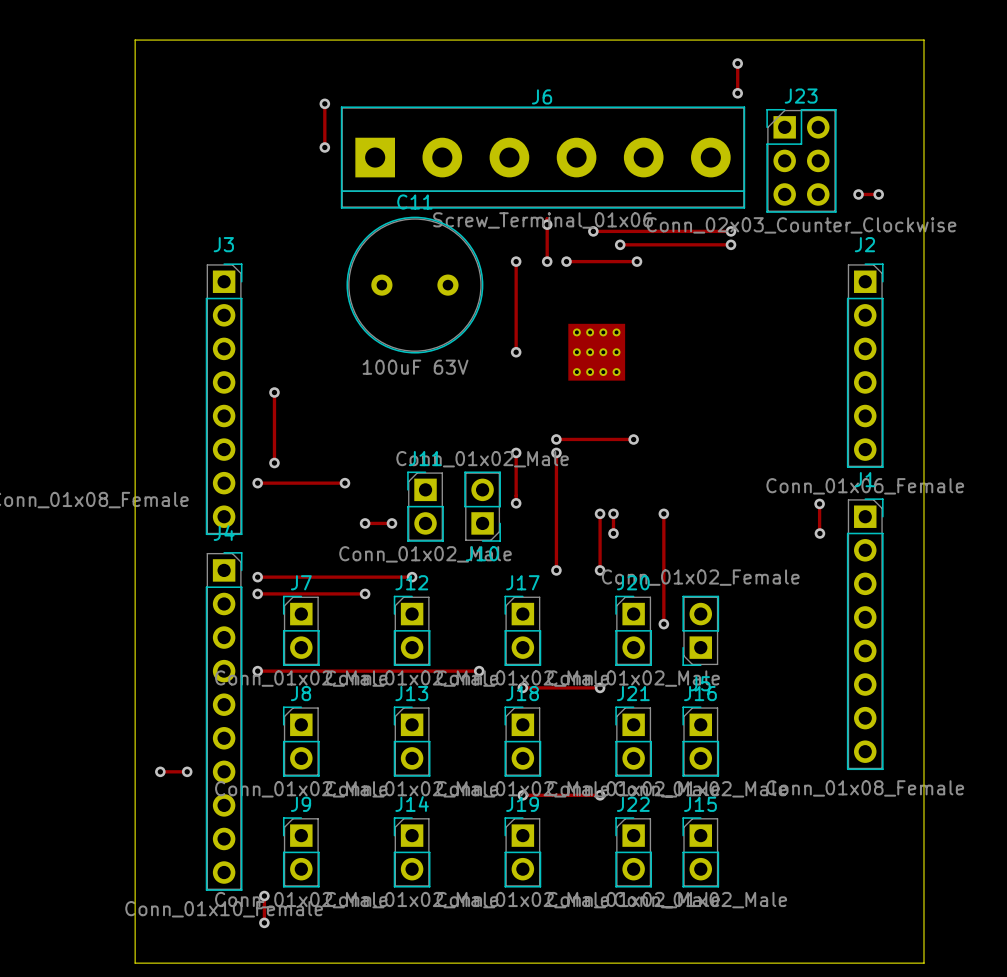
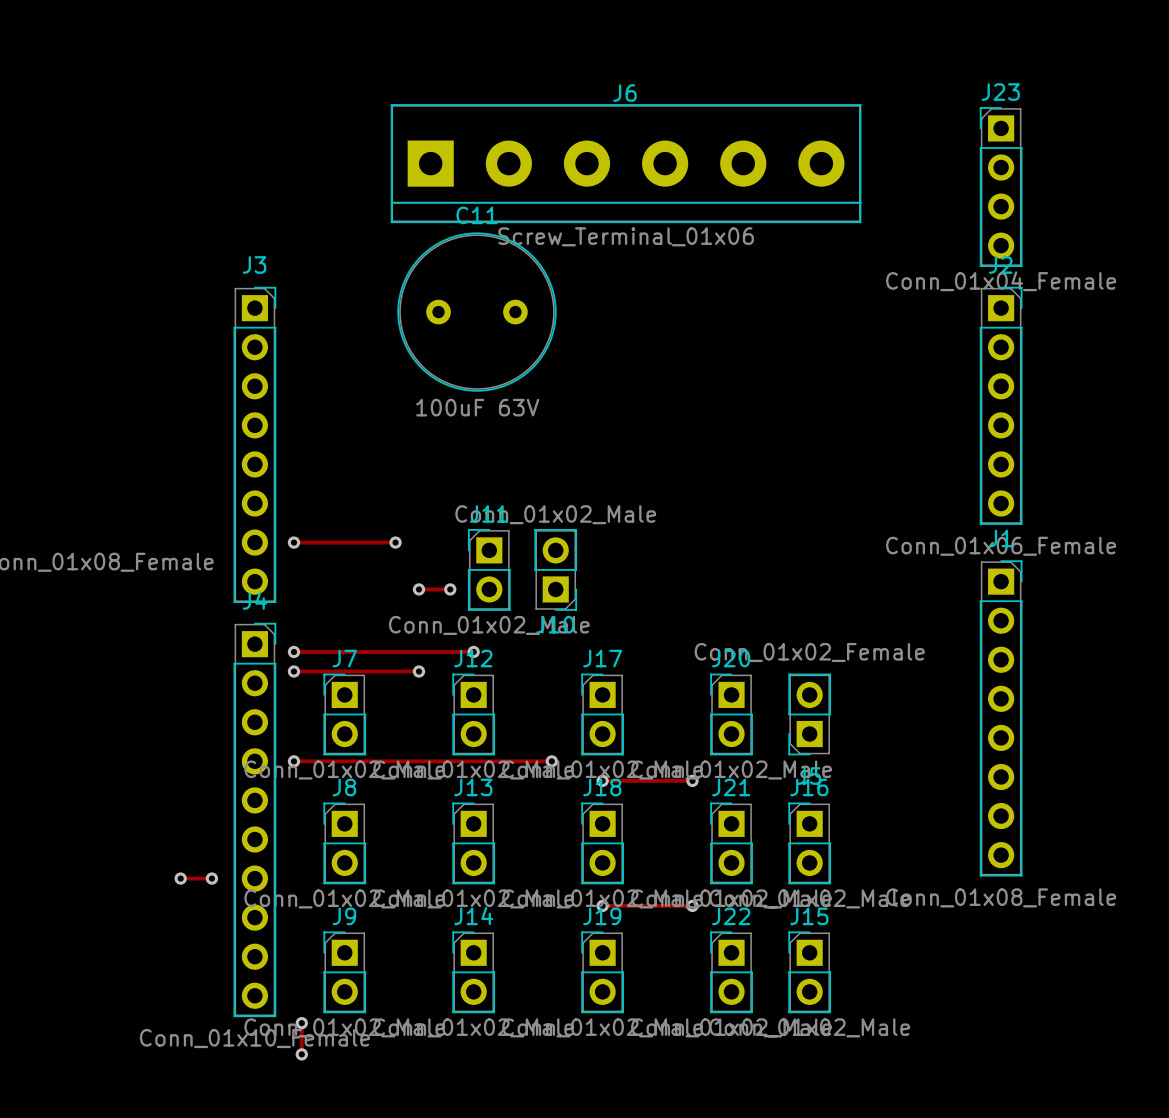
board edge: (135, 40) (135, 963) (923, 963) (923, 40) (135, 40) -> none
track: (737, 63) (737, 93) -> none
via: (737, 63) -> none
via: (737, 93) -> none
track: (324, 103) (324, 147) -> none
via: (324, 103) -> none
J23 footprint: [766, 108, 837, 213] -> [979, 107, 1023, 268]
via: (324, 147) -> none
track: (858, 194) (878, 194) -> none
via: (858, 194) -> none
via: (878, 194) -> none
track: (547, 218) (547, 261) -> none
via: (547, 224) -> none
J23 value: Conn_02x03_Counter_Clockwise (801, 225) -> Conn_01x04_Female (1001, 281)
track: (593, 231) (730, 231) -> none
via: (593, 231) -> none
via: (730, 231) -> none
track: (620, 244) (730, 244) -> none
via: (620, 244) -> none
via: (730, 244) -> none
track: (516, 261) (516, 352) -> none
via: (516, 261) -> none
via: (547, 261) -> none
track: (566, 261) (636, 261) -> none
via: (566, 261) -> none
via: (636, 261) -> none
via: (516, 352) -> none
part: (596, 352) -> none
track: (274, 392) (274, 463) -> none
via: (274, 392) -> none
track: (556, 439) (633, 439) -> none
via: (556, 439) -> none
via: (633, 439) -> none
track: (516, 452) (516, 503) -> none
via: (516, 452) -> none
track: (556, 452) (556, 570) -> none
via: (556, 452) -> none
via: (274, 463) -> none
via: (516, 503) -> none
track: (819, 503) (819, 533) -> none
via: (819, 503) -> none
track: (600, 513) (600, 570) -> none
via: (600, 513) -> none
track: (613, 513) (613, 533) -> none
via: (613, 513) -> none
track: (663, 513) (663, 624) -> none
via: (663, 513) -> none
via: (613, 533) -> none
via: (819, 533) -> none
via: (556, 570) -> none
via: (600, 570) -> none
via: (663, 624) -> none

